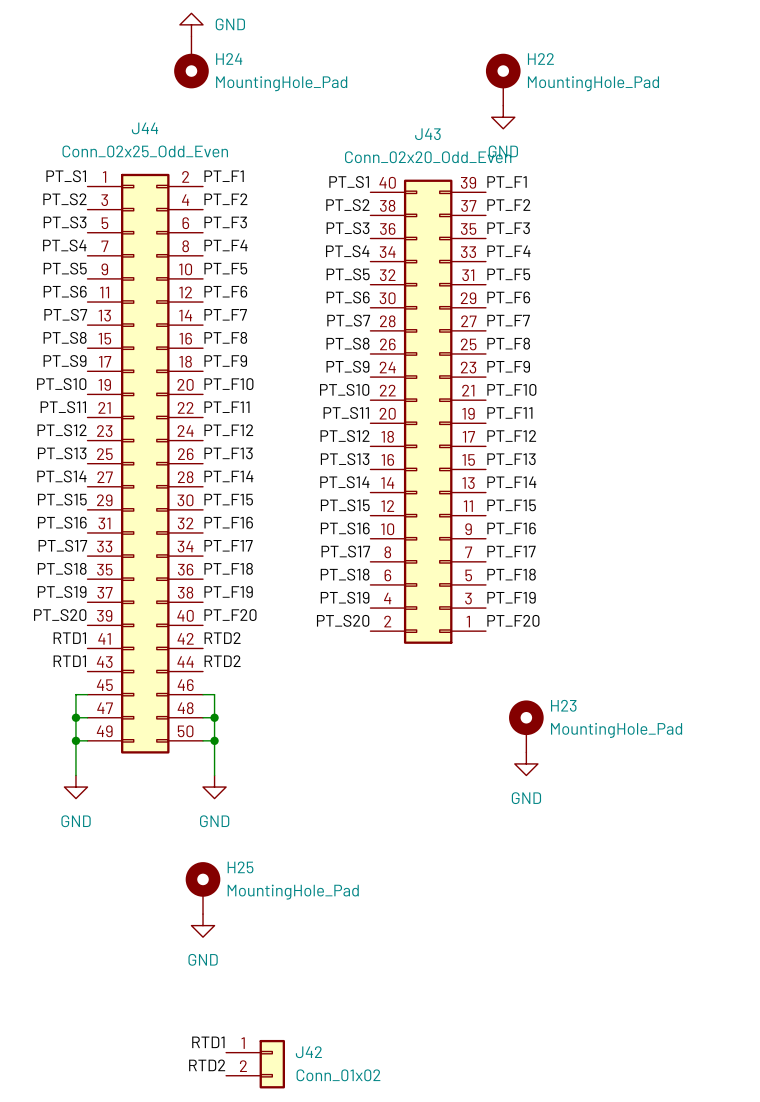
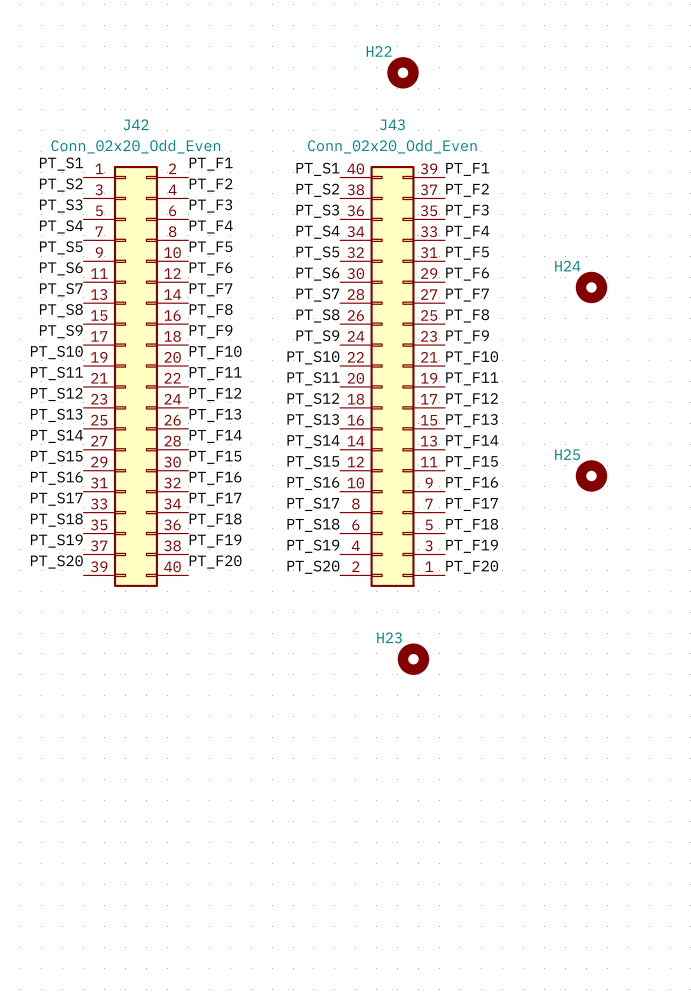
power symbol: GND (191, 24) -> none
H24 symbol: [174, 36, 209, 89] -> [575, 271, 608, 304]
H22 symbol: [485, 53, 521, 106] -> [387, 57, 419, 89]
H24 name position: H24 (229, 59) -> H24 (567, 266)
H22 name position: H22 (540, 59) -> H22 (379, 51)
H24 value: MountingHole_Pad (281, 83) -> none
H22 value: MountingHole_Pad (593, 83) -> none
power symbol: GND (503, 117) -> none
J44: Conn_02x25_Odd_Even (145, 463) -> none
label: RTD1 (69, 638) -> none
label: RTD2 (222, 638) -> none
label: RTD1 (69, 661) -> none
label: RTD2 (222, 661) -> none
wire: (87, 694) (75, 694) (75, 775) -> none
wire: (203, 694) (214, 694) (214, 775) -> none
H23 symbol: [509, 700, 544, 753] -> [397, 643, 430, 675]
H23 name position: H23 (563, 705) -> H23 (389, 637)
wire: (75, 717) (87, 717) -> none
junction: (75, 717) -> none
wire: (203, 717) (214, 717) -> none
junction: (214, 717) -> none
H23 value: MountingHole_Pad (616, 730) -> none
wire: (75, 740) (87, 740) -> none
junction: (75, 740) -> none
wire: (203, 740) (214, 740) -> none
junction: (214, 740) -> none
power symbol: GND (526, 763) -> none
power symbol: GND (75, 787) -> none
power symbol: GND (214, 787) -> none
H25 symbol: [185, 862, 221, 915] -> [575, 460, 608, 492]
H25 name position: H25 (240, 867) -> H25 (567, 454)
H25 value: MountingHole_Pad (293, 892) -> none
power symbol: GND (203, 925) -> none
J42 symbol: [226, 1039, 285, 1089] -> [83, 166, 189, 587]
label: RTD1 (208, 1042) -> none
J42 name position: J42 (308, 1052) -> J42 (136, 124)
label: RTD2 (207, 1065) -> none
J42 value: Conn_01x02 (338, 1075) -> Conn_02x20_Odd_Even (135, 146)

